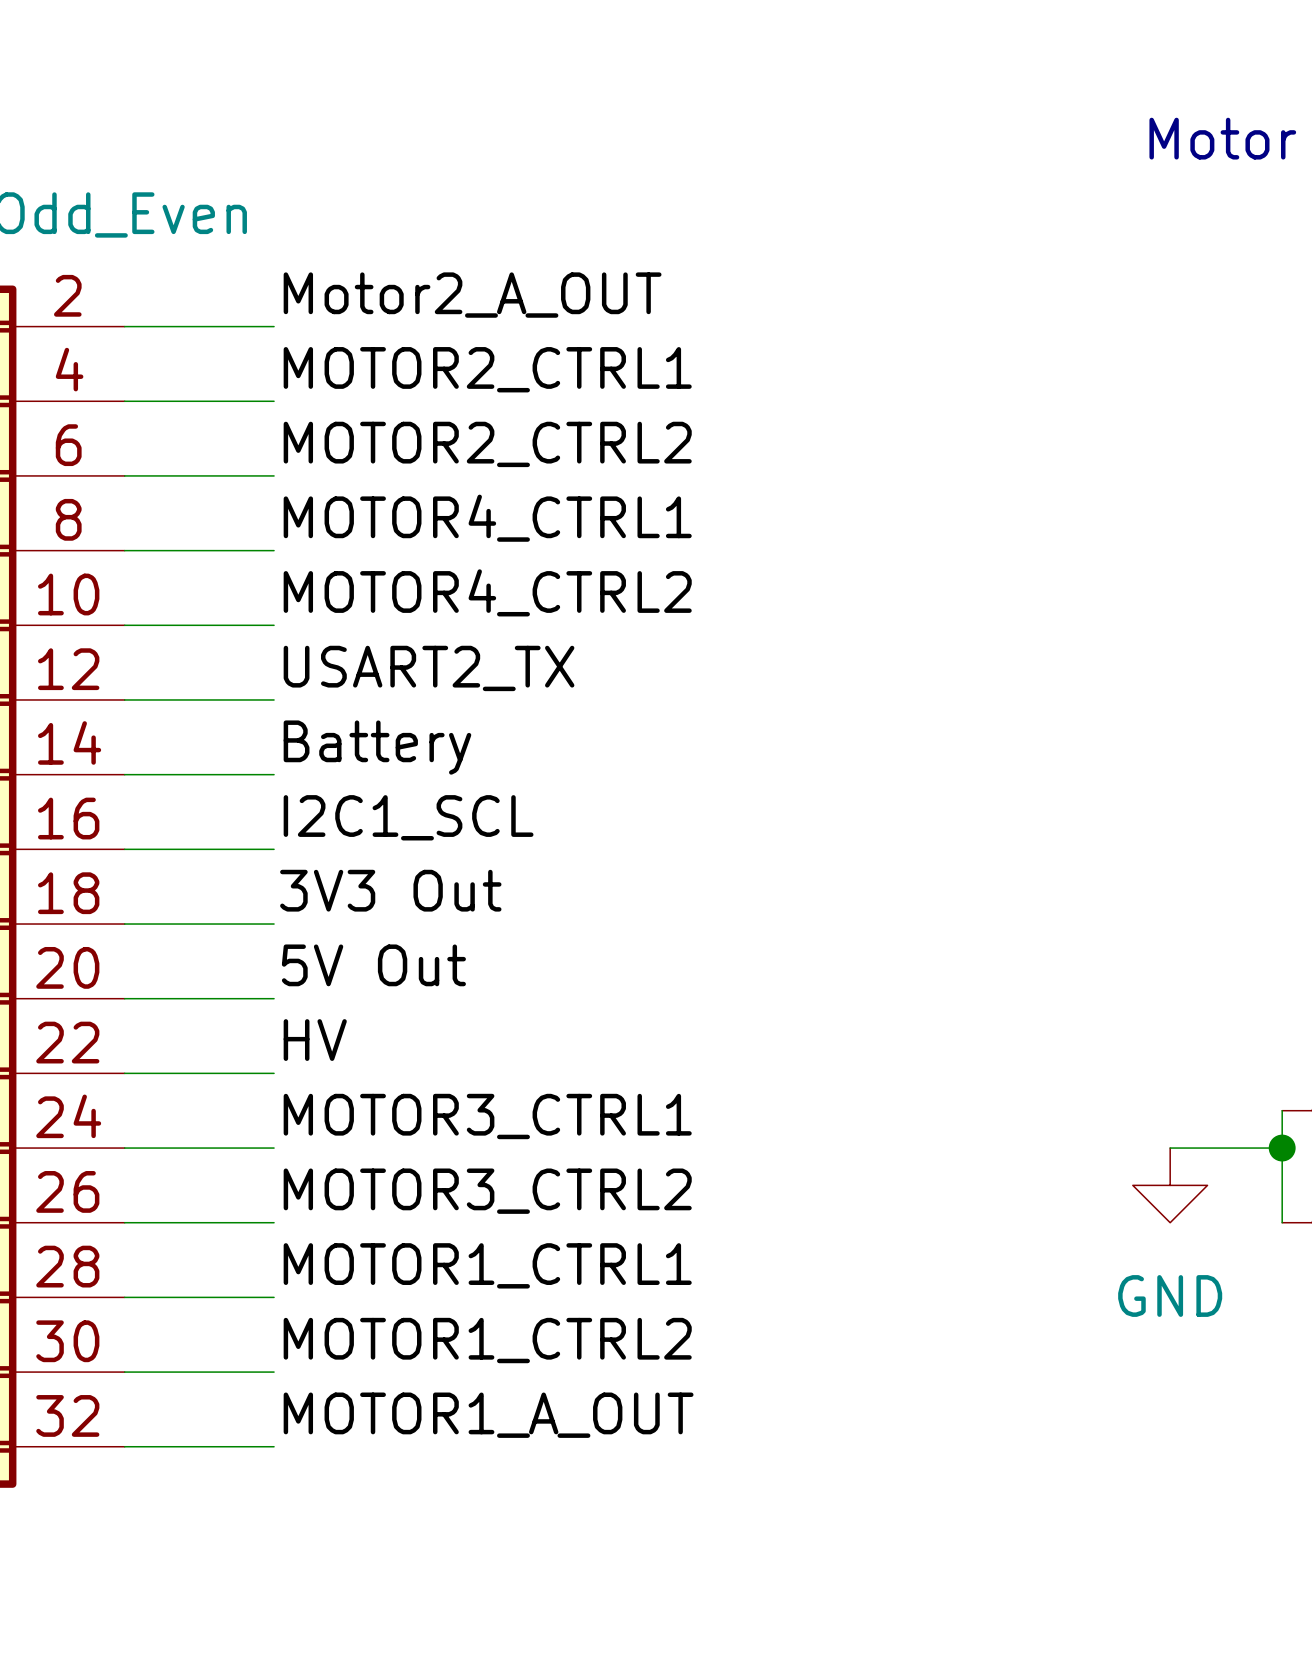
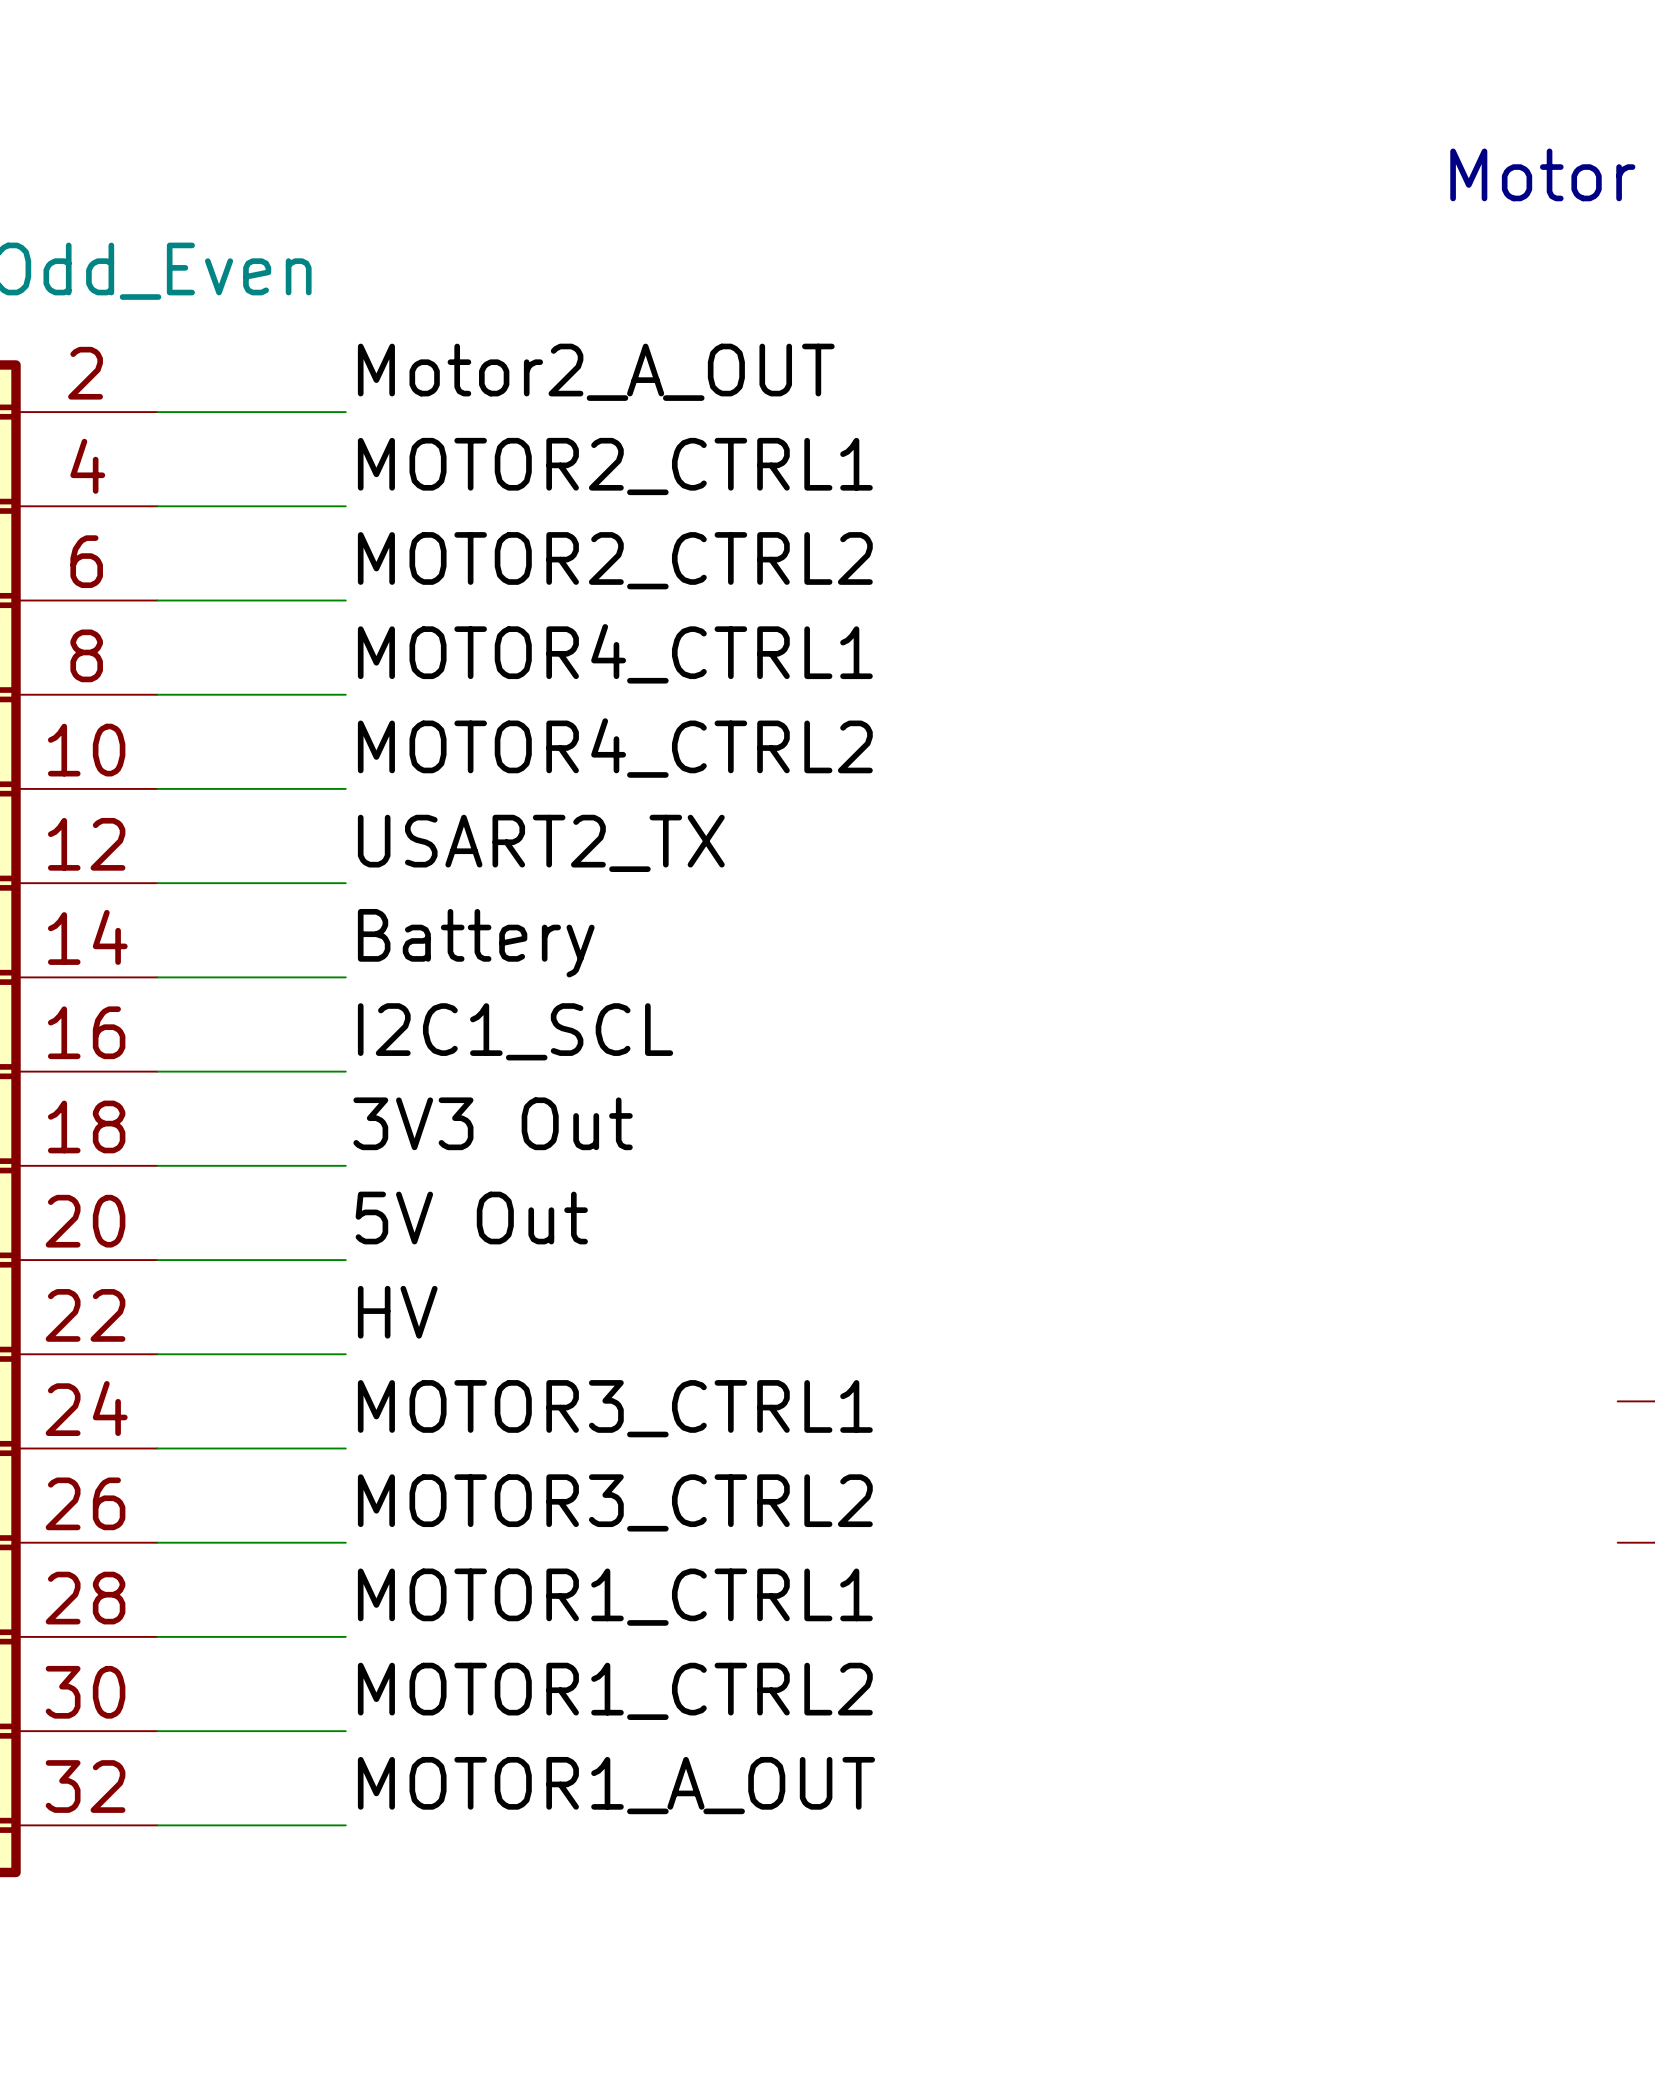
wire: (1282, 1110) (1282, 1222) -> none
wire: (1170, 1148) (1282, 1148) -> none
junction: (1282, 1148) -> none
power symbol: GND (1170, 1185) -> none

